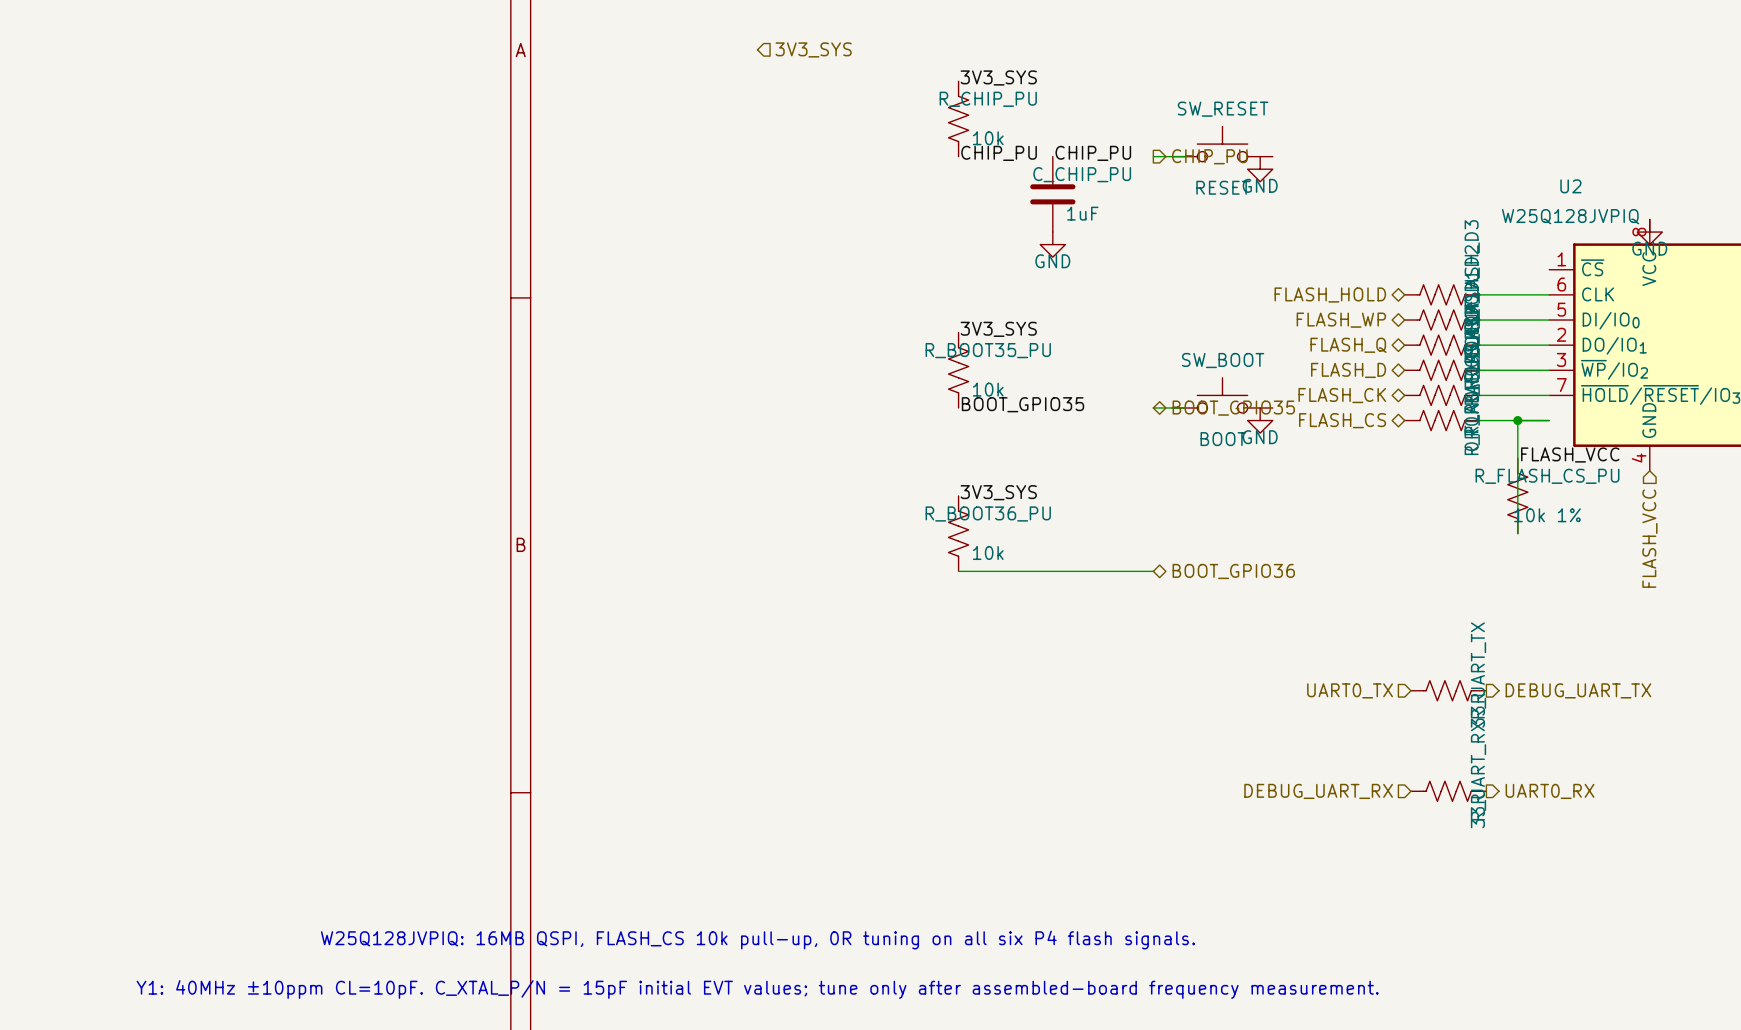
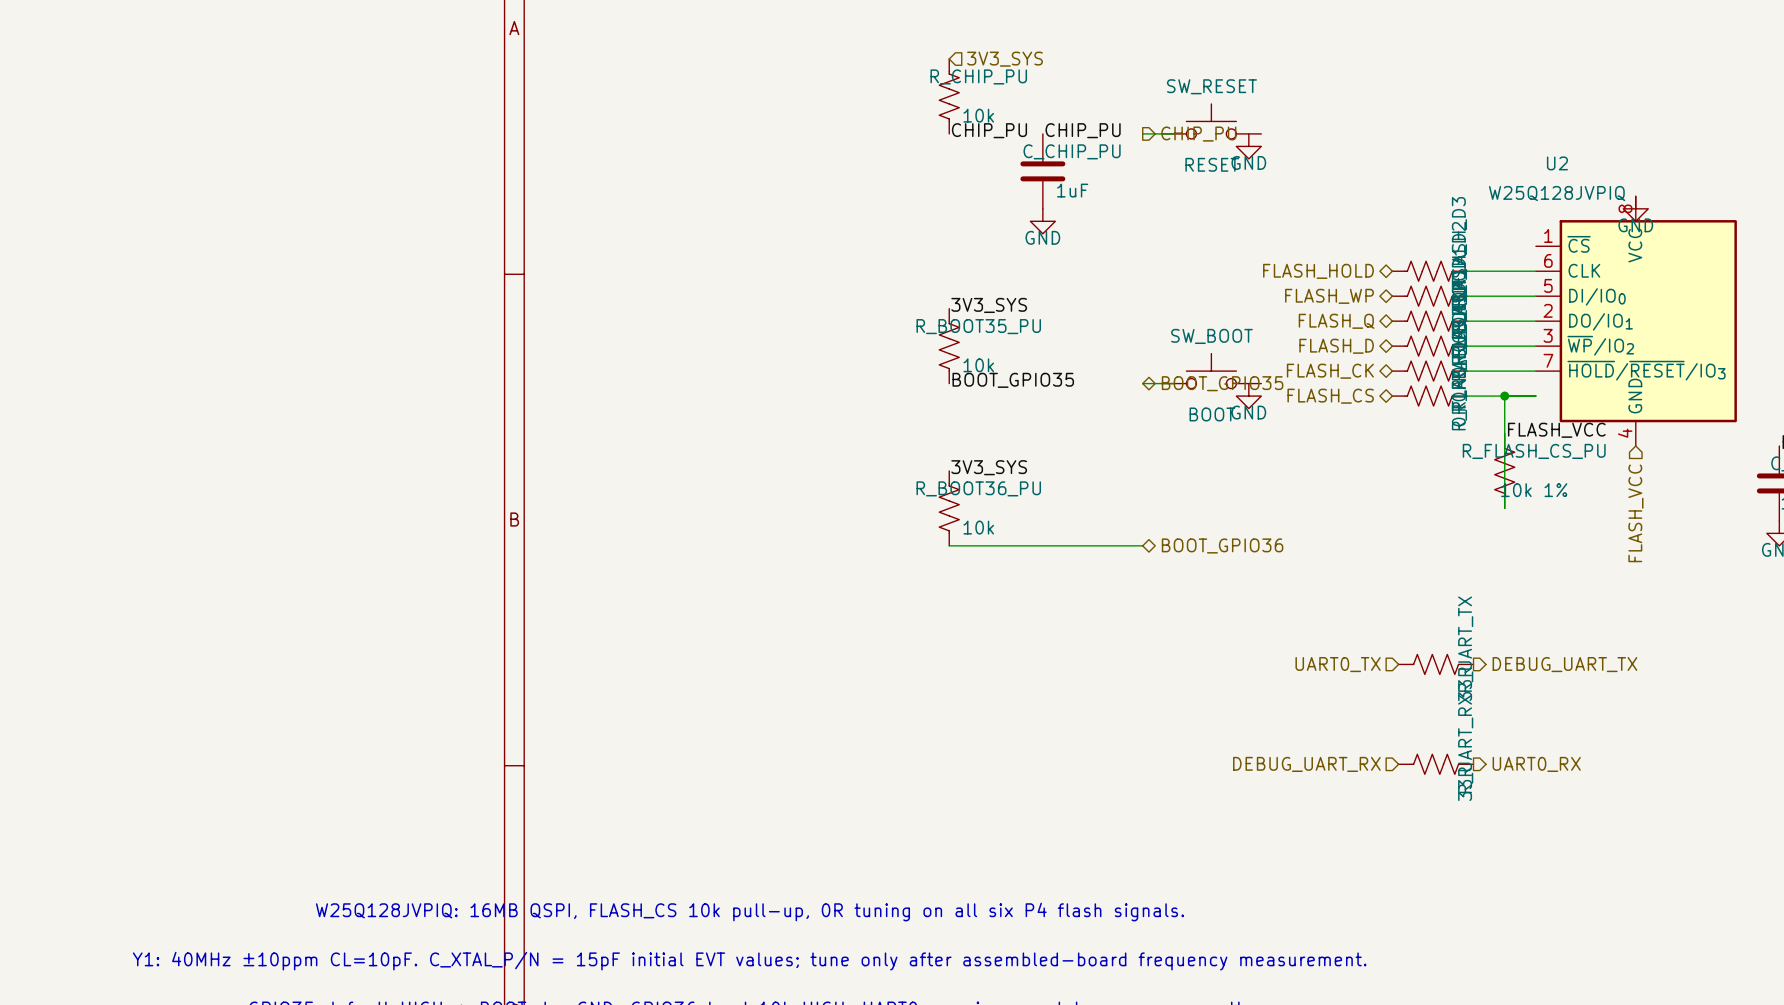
hierarchical label position: 3V3_SYS (813, 49) -> 3V3_SYS (1005, 59)
label: 3V3_SYS (998, 77) -> none

